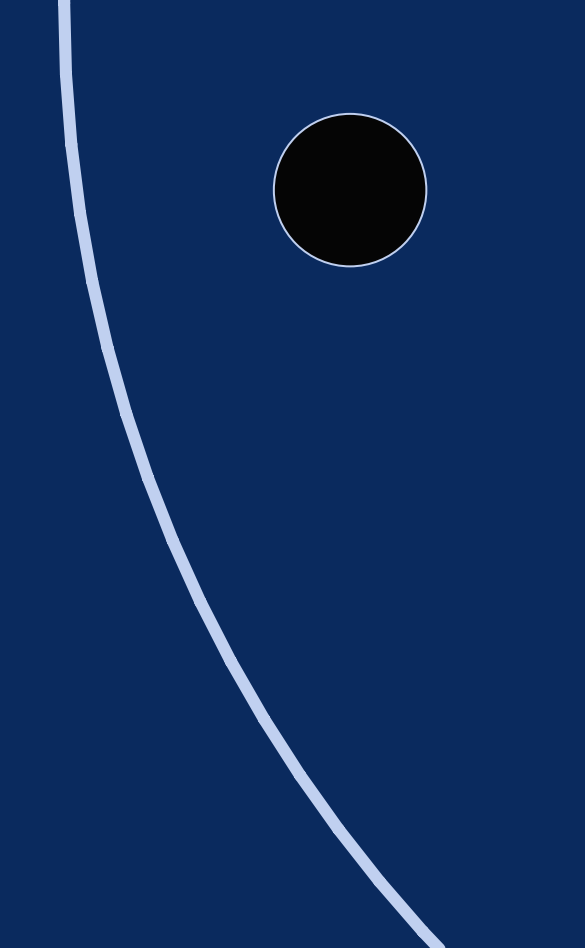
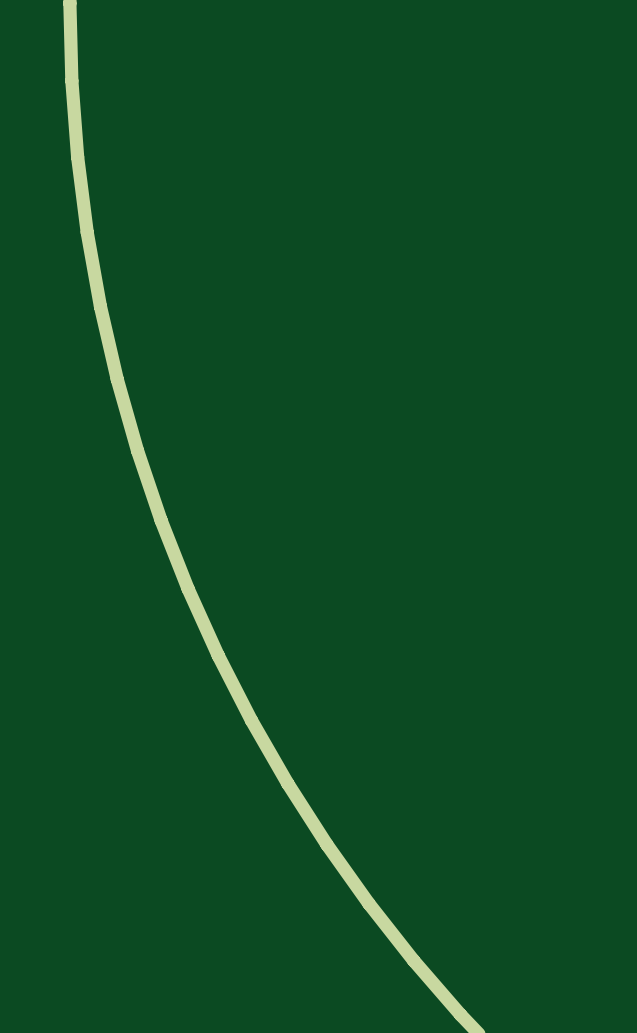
part: (350, 190) -> none

